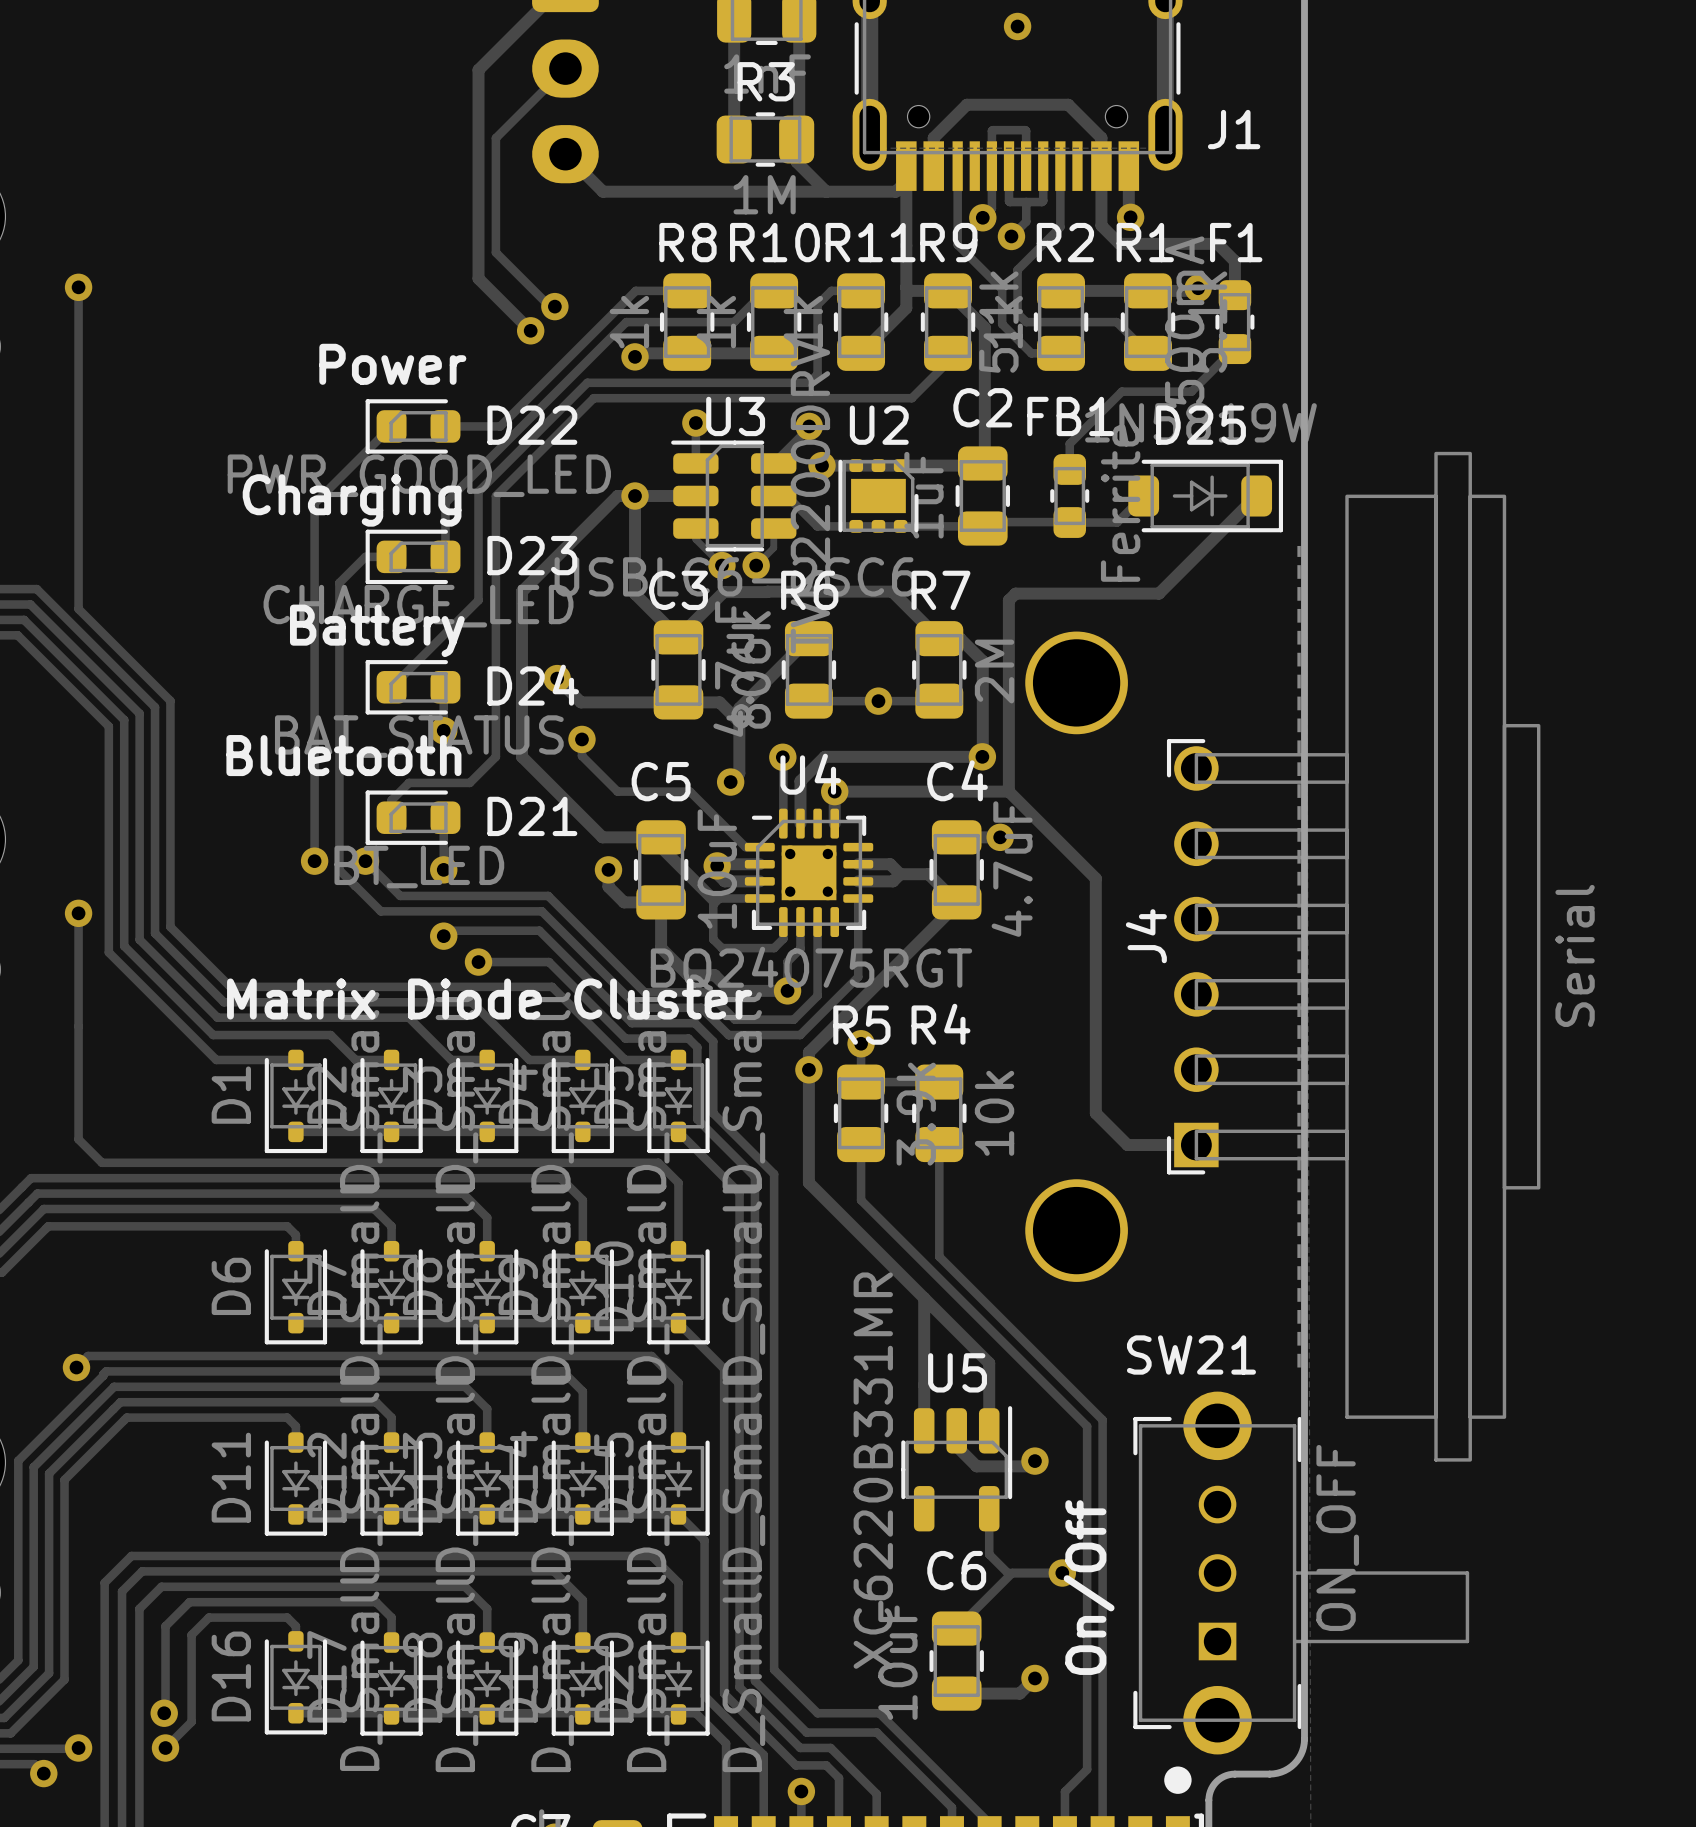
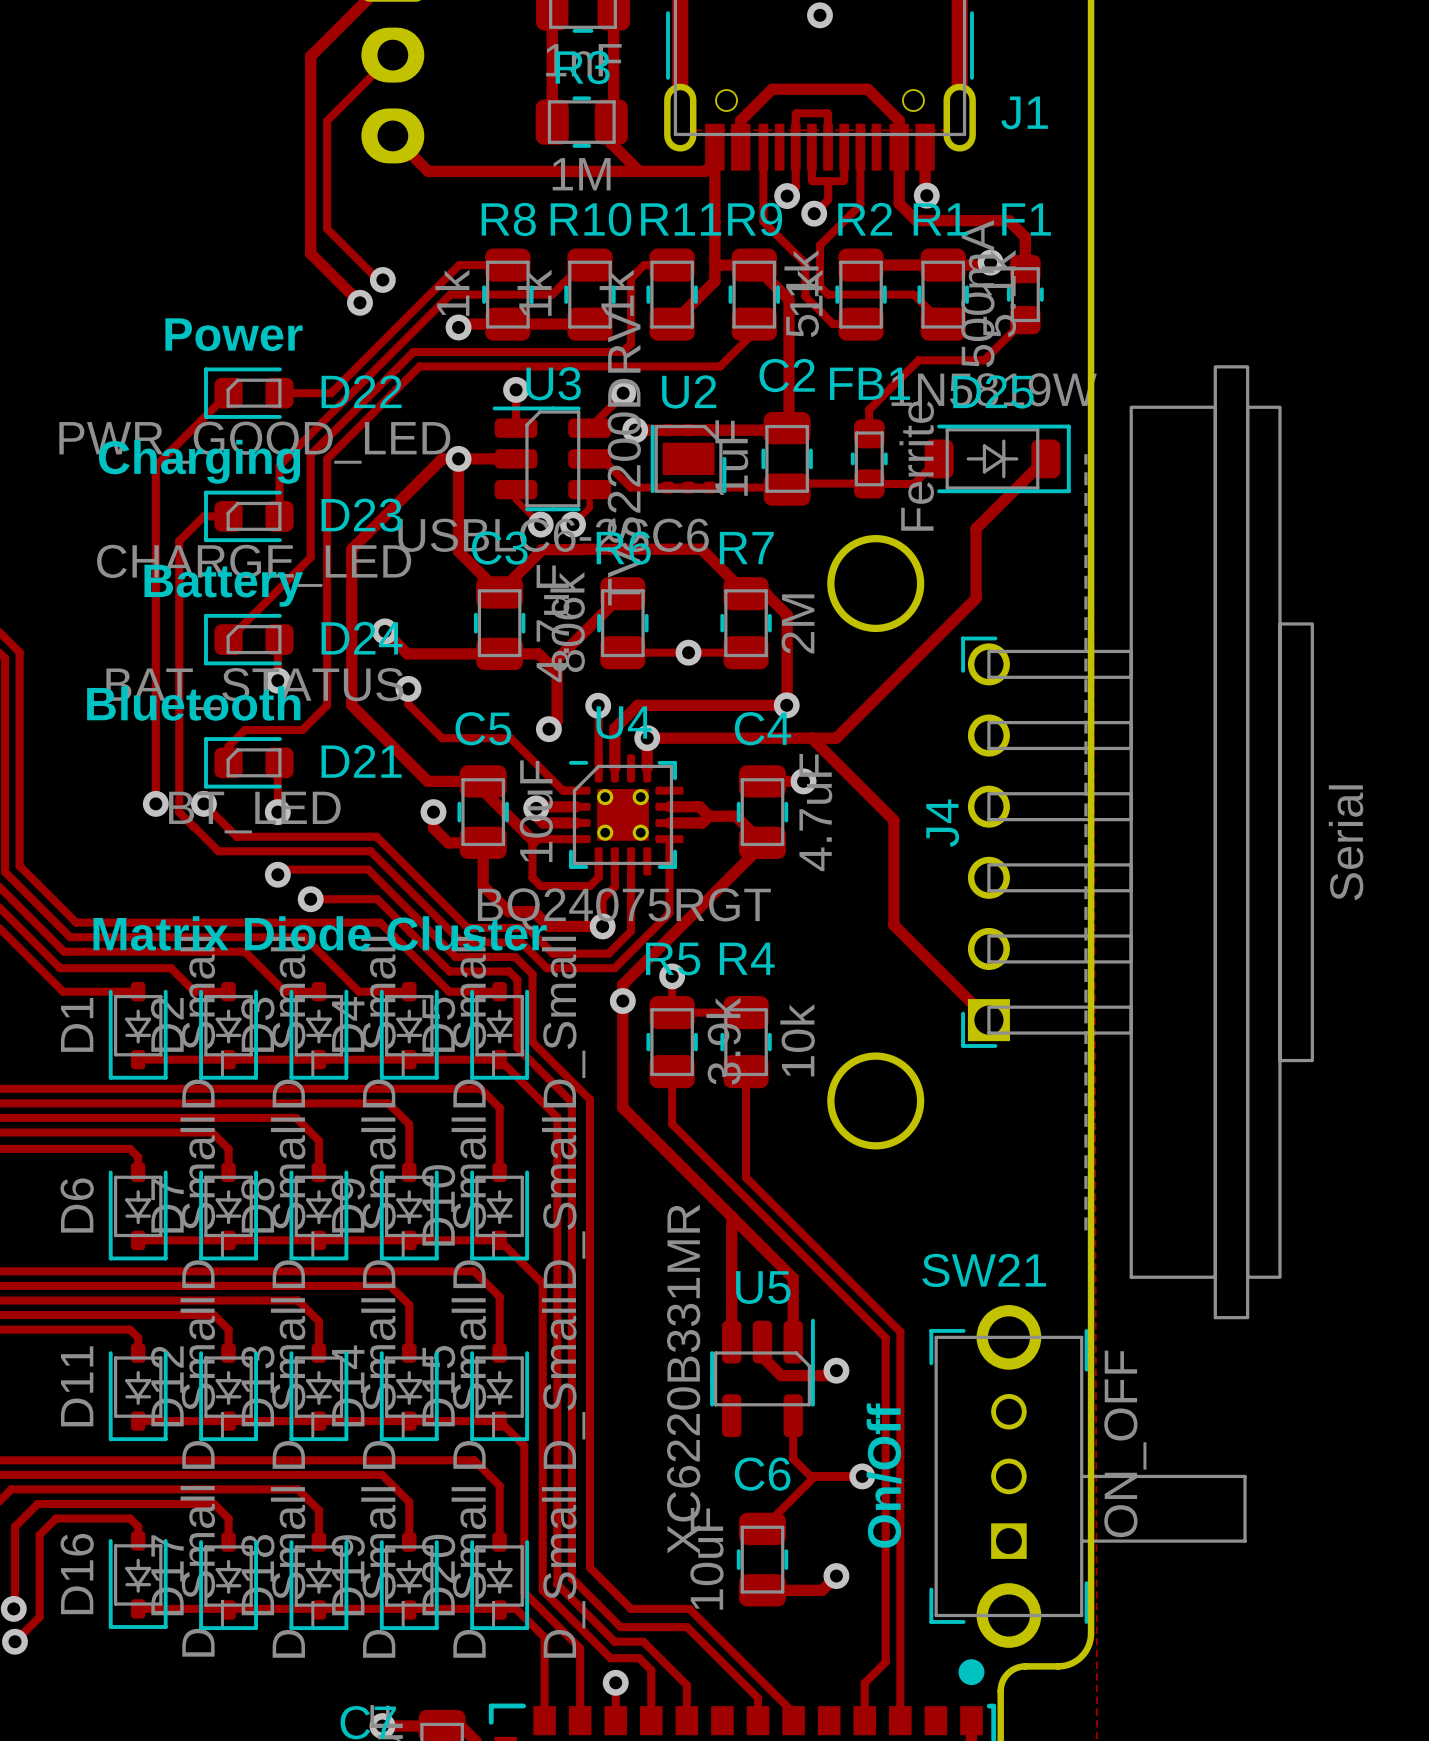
track: (1182, 569) (1159, 593) (1015, 593) (1008, 600) (1008, 791) -> (976, 528) (976, 598) (836, 738) (811, 738)
J4 position: (1282, 956) -> (1070, 842)
track: (1095, 989) (1095, 1113) (1127, 1145) (1196, 1145) -> (893, 925) (988, 1020)

